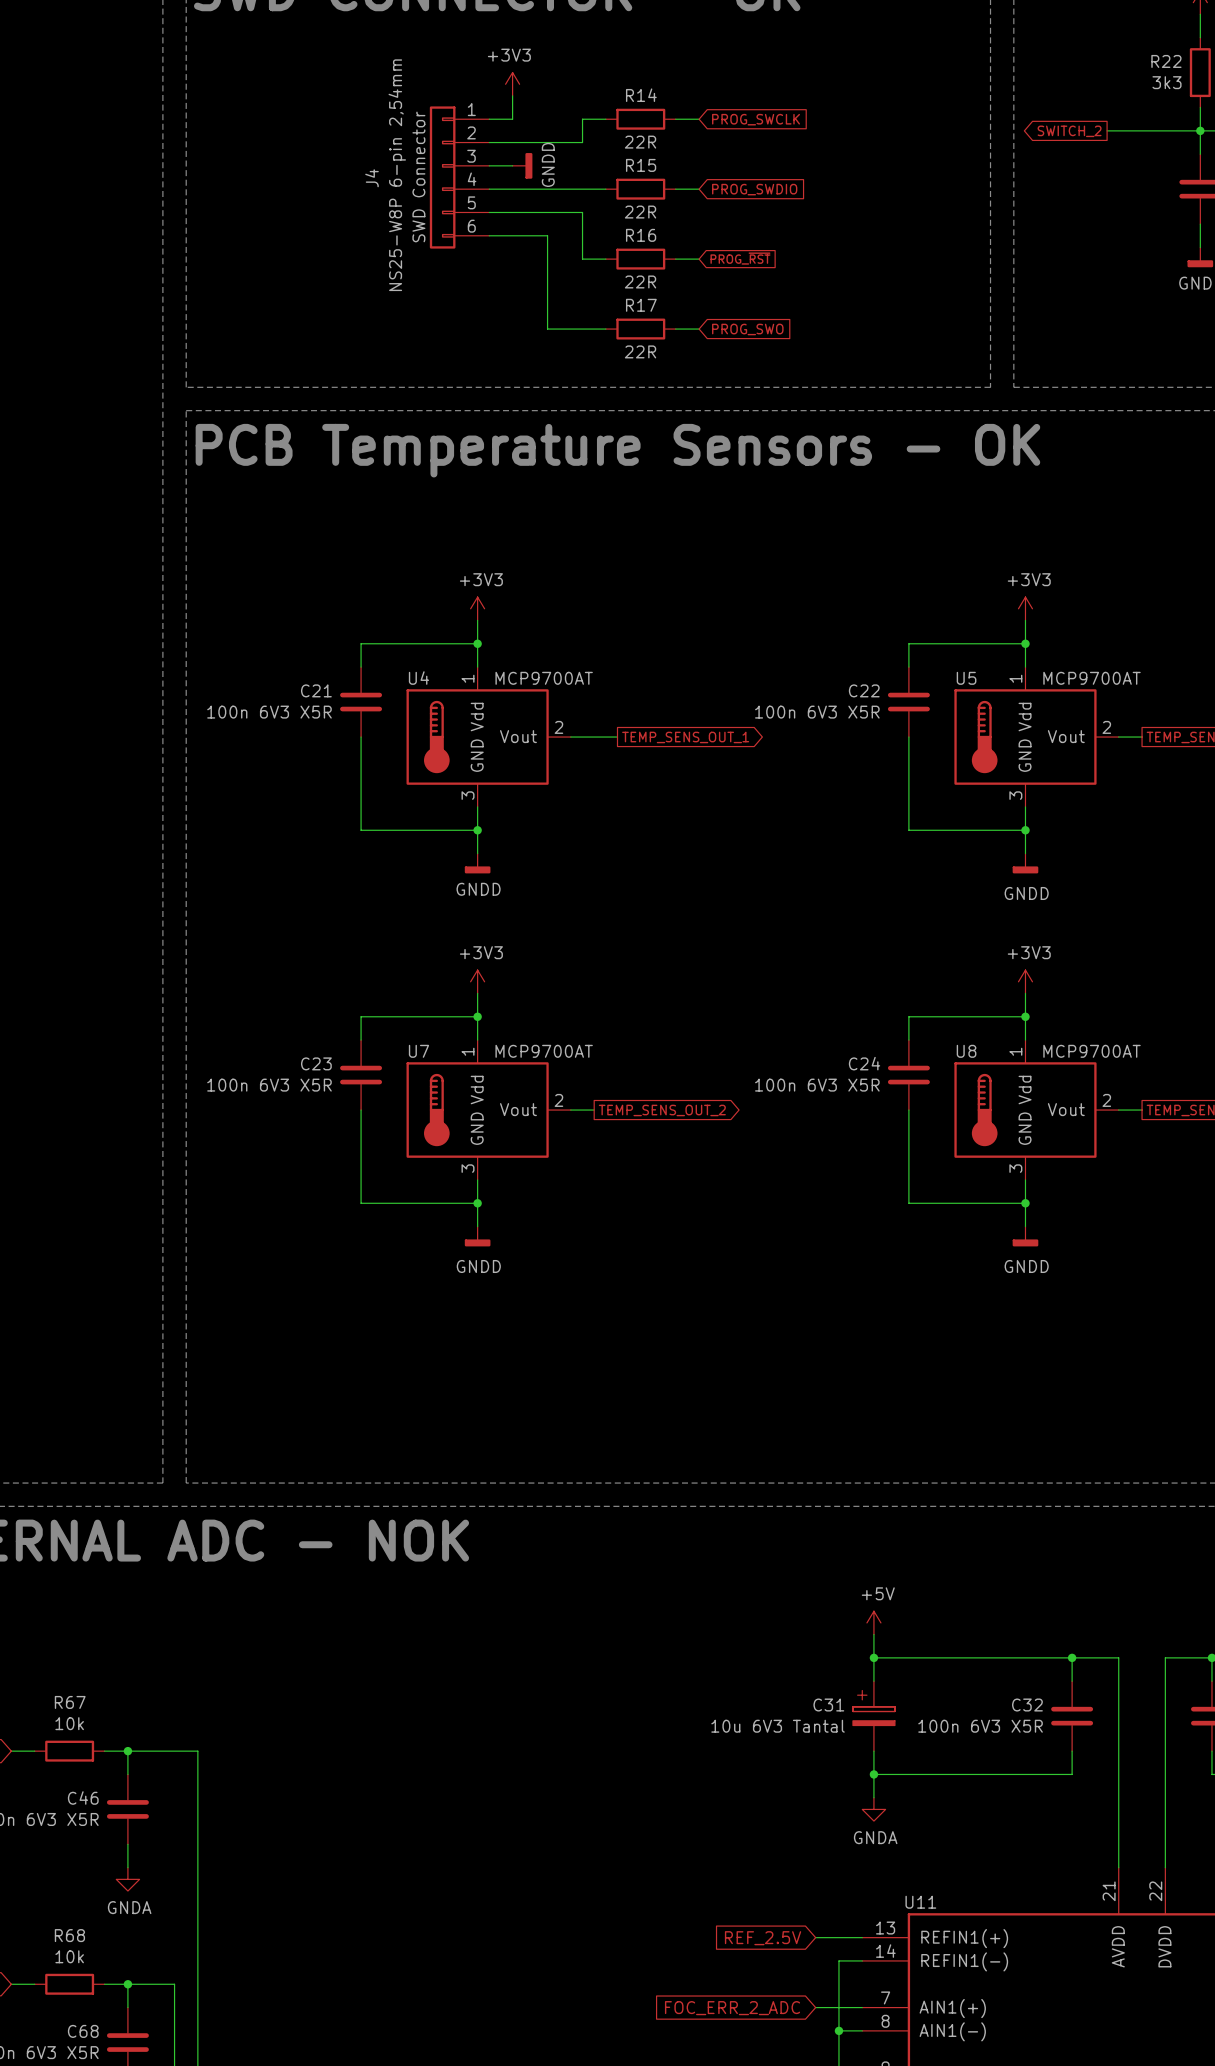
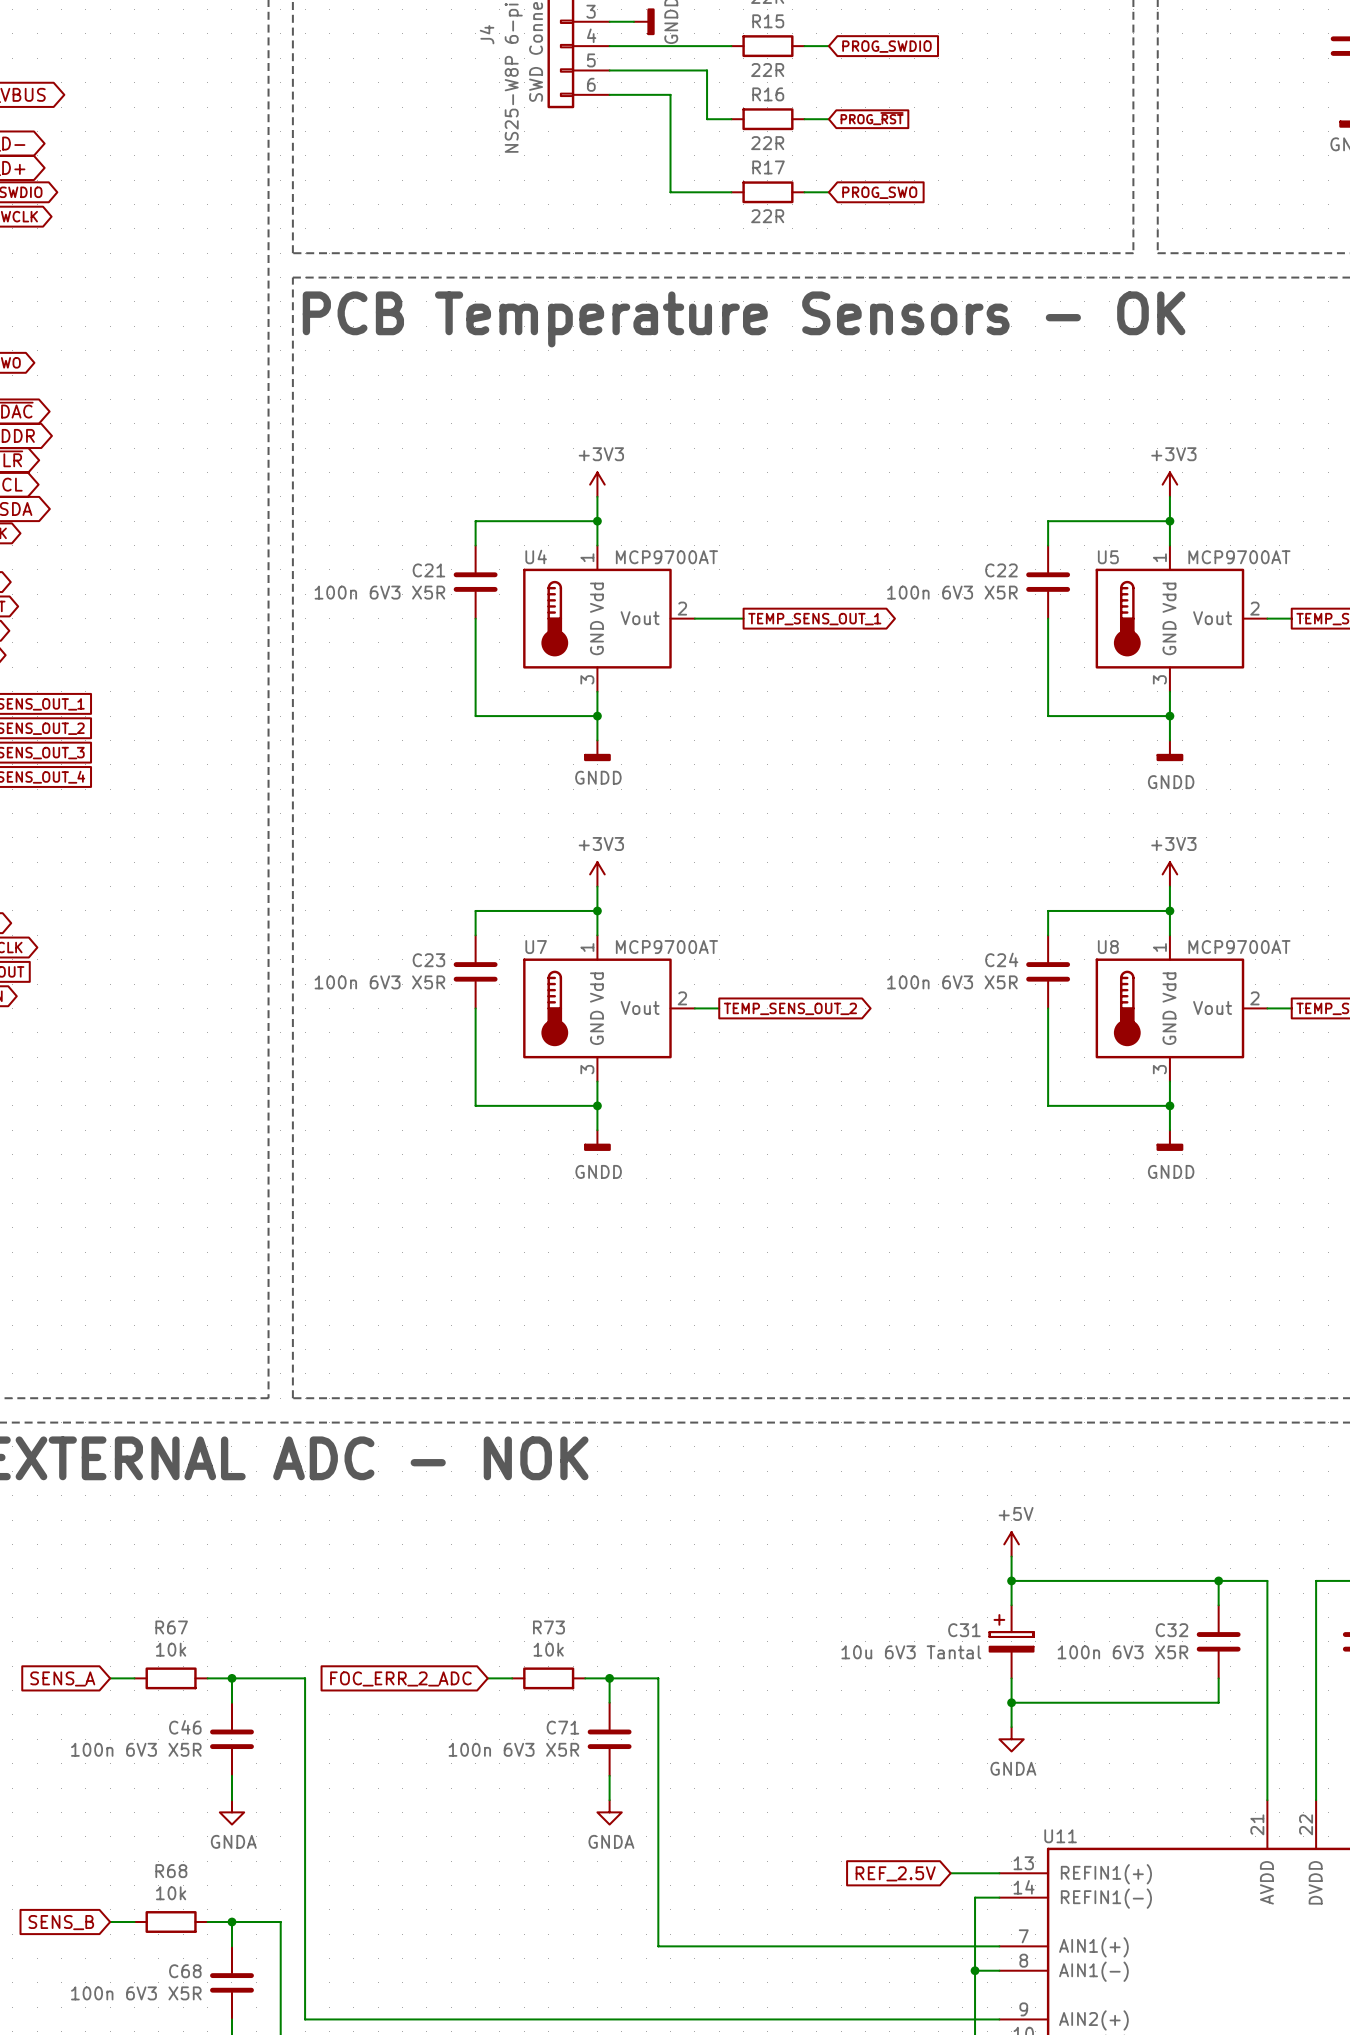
global label: none -> FOC_ERR_2_ADC (400, 1678)
wire: none -> (487, 1678) (512, 1678)
R73: none -> 10k (548, 1678)
wire: none -> (585, 1678) (658, 1678) (658, 1946) (950, 1946)
wire: none -> (609, 1678) (609, 1702)
junction: none -> (609, 1678)
C71: none -> 100n 6V3 X5R (609, 1739)
wire: none -> (609, 1775) (609, 1800)
power symbol: none -> GNDA (609, 1812)
global label: FOC_ERR_2_ADC (732, 2008) -> none

